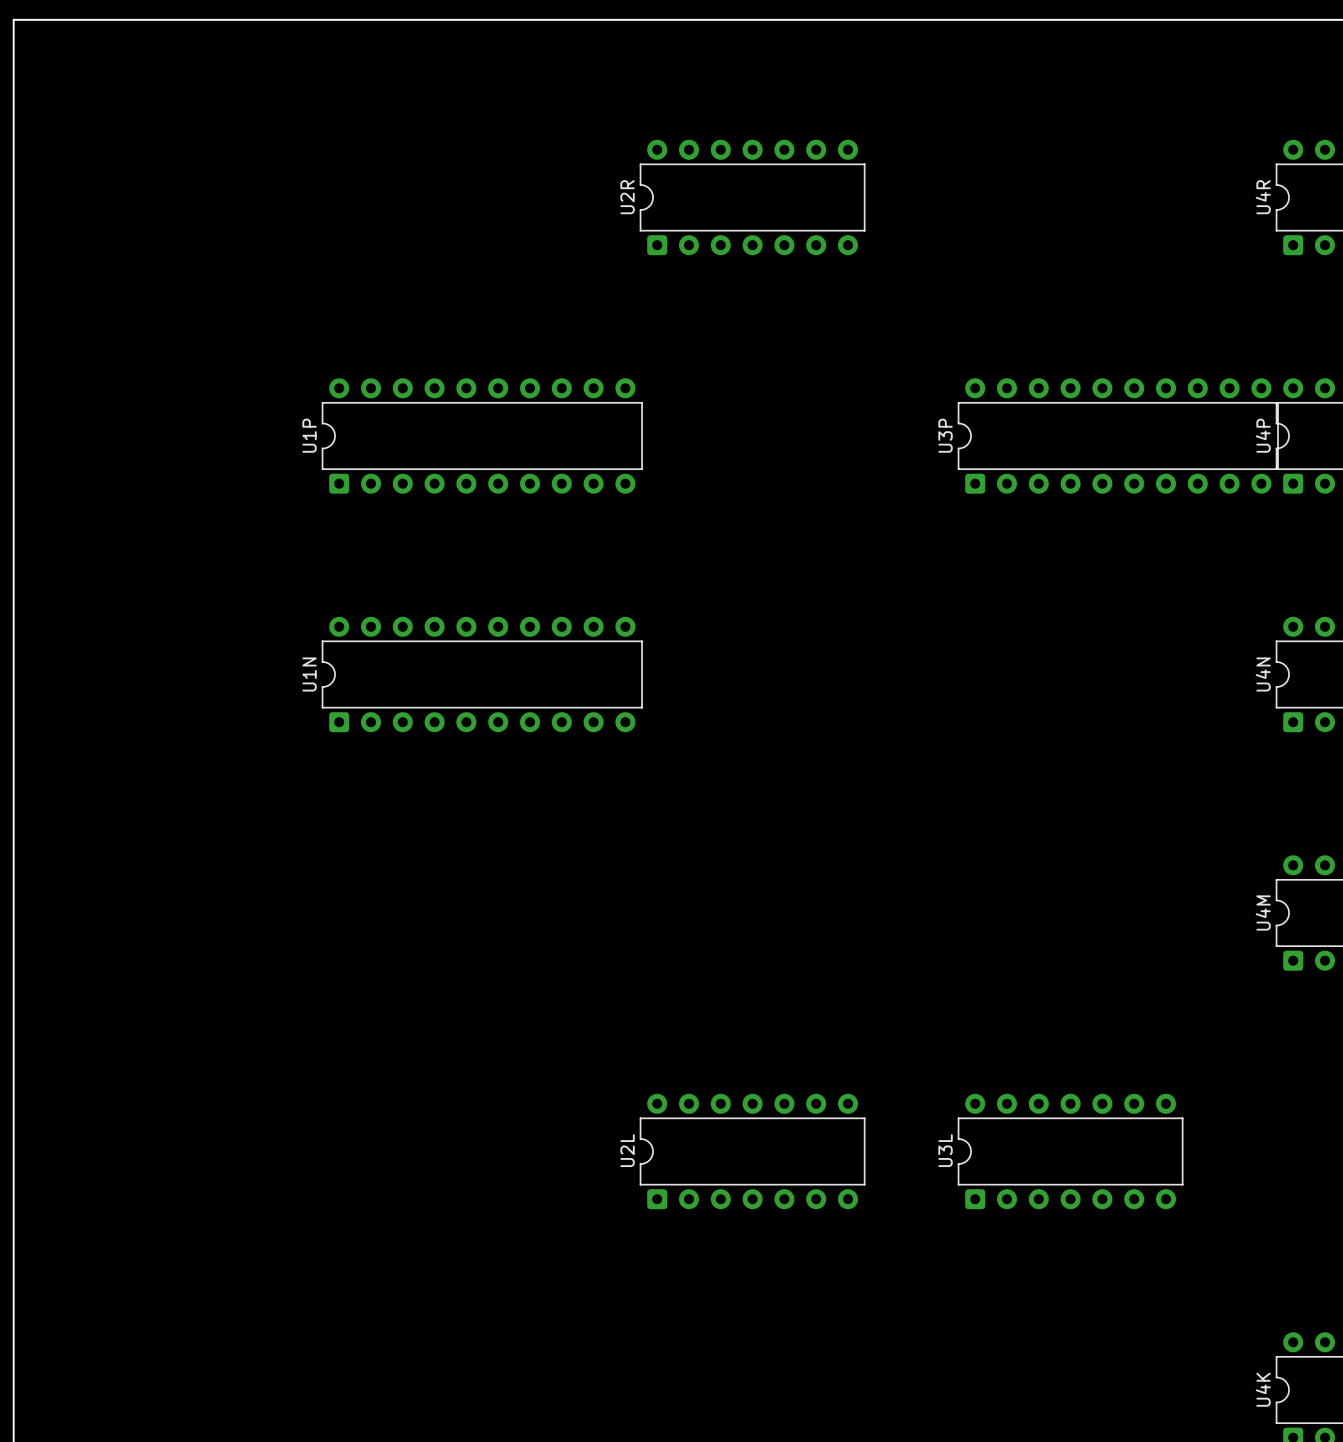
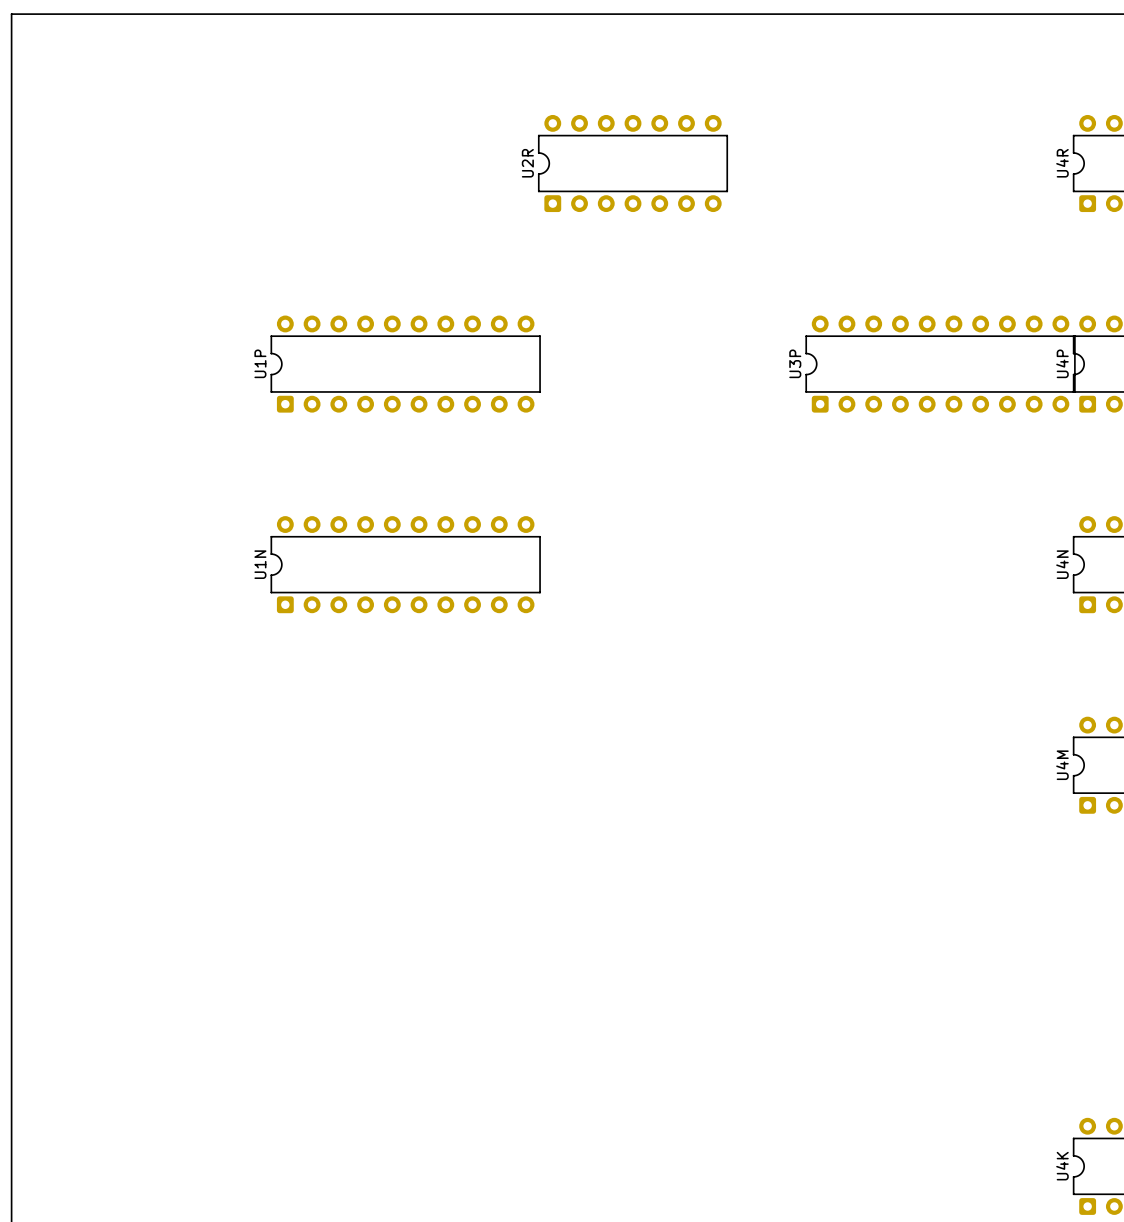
U2L: (752, 1151) -> none
U3L: (1070, 1151) -> none

